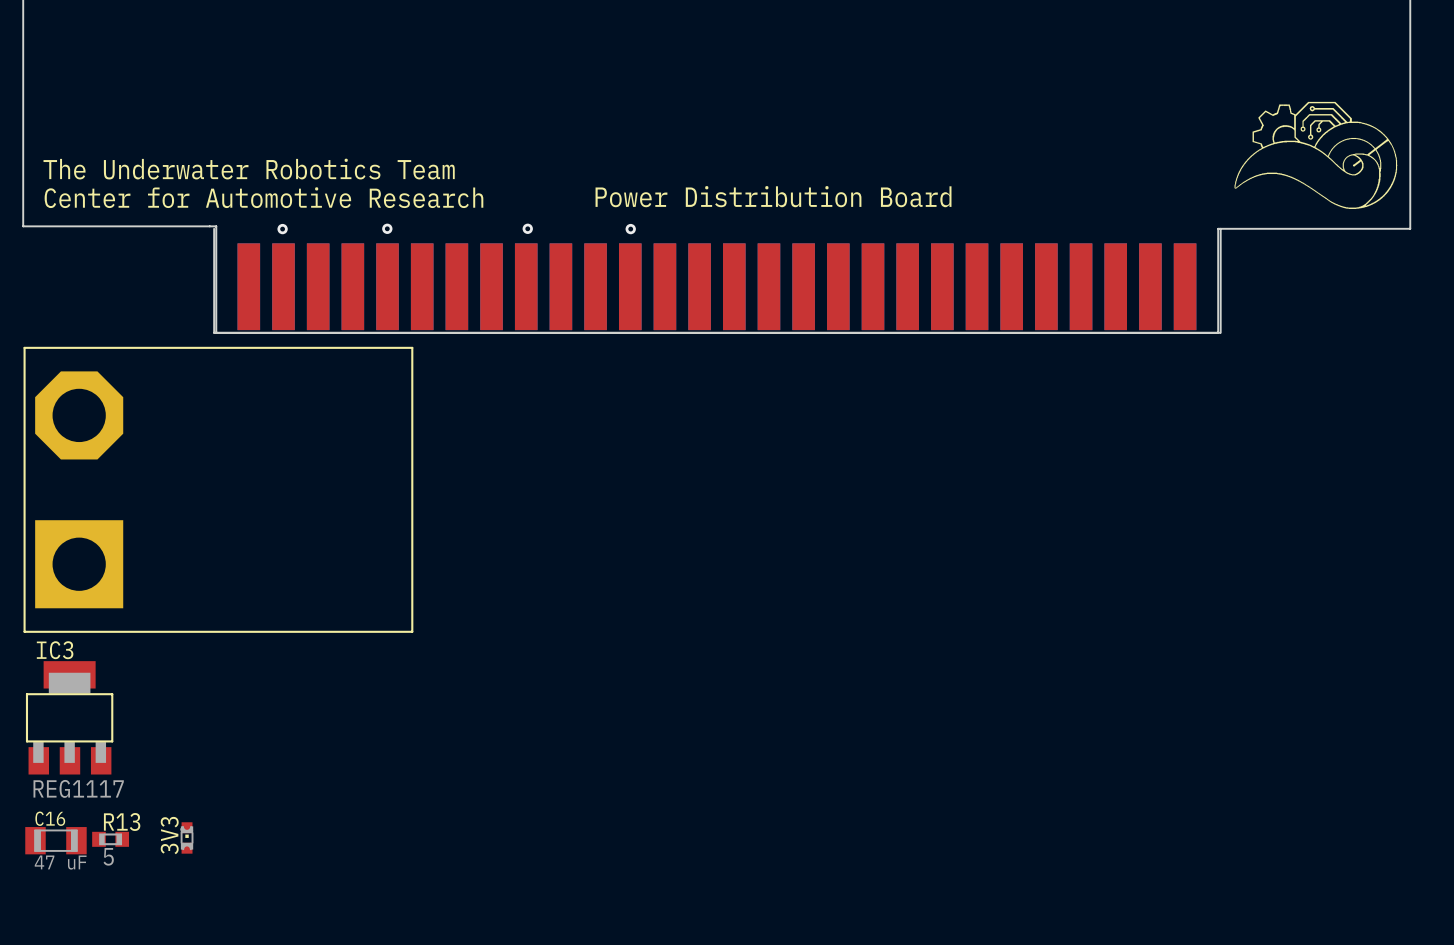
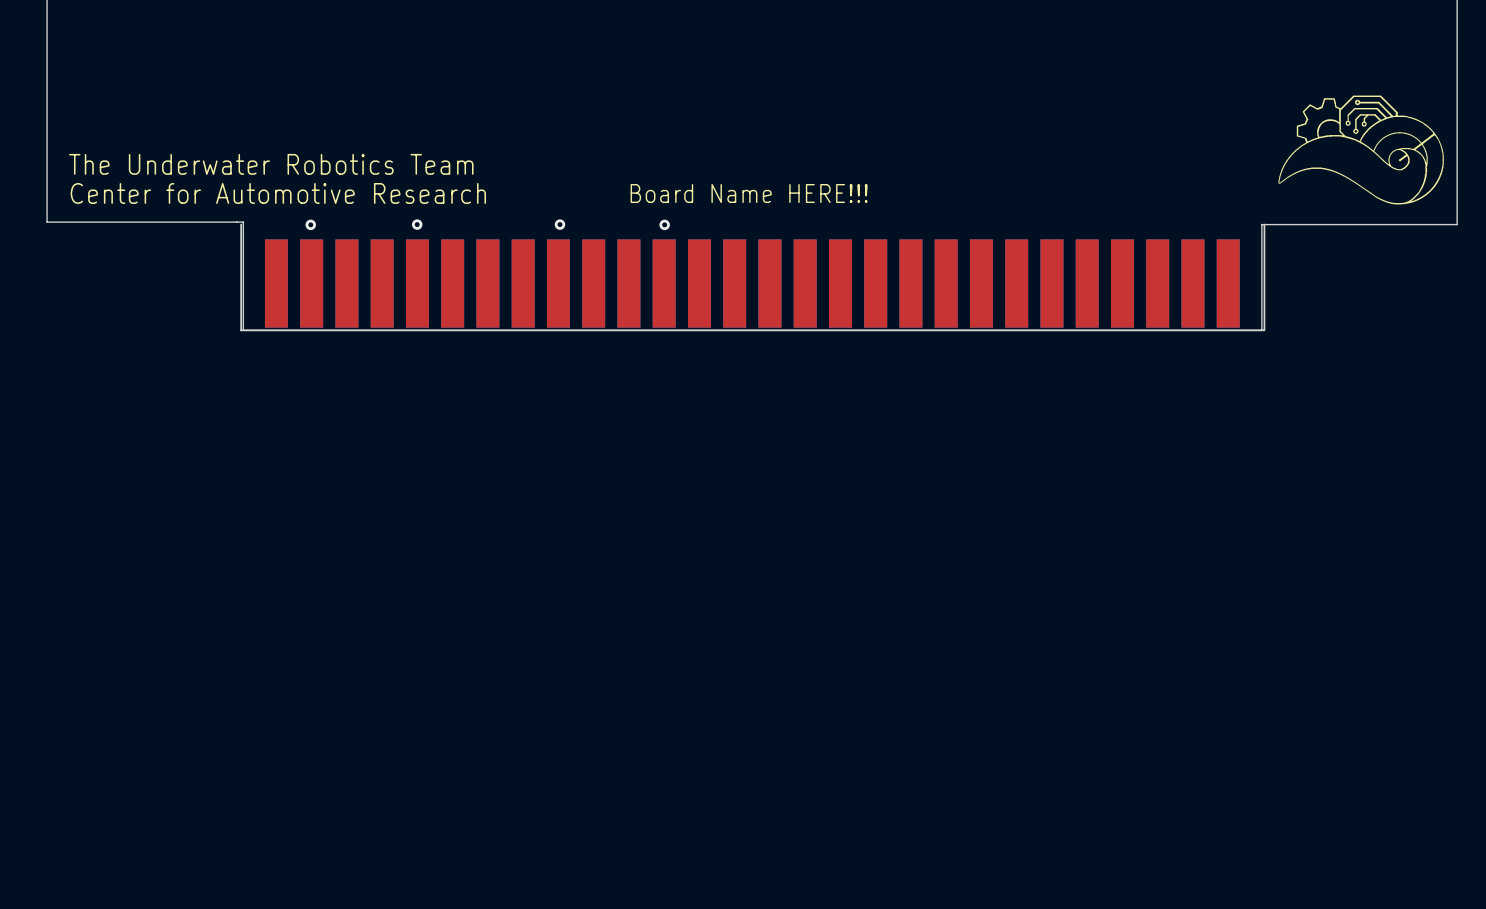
text: Power Distribution Board (773, 196) -> Board Name HERE!!! (749, 193)
part: (218, 489) -> none
IC3: REG1117 (69, 717) -> none
3V3: (187, 837) -> none
R13: 5 (110, 839) -> none
C16: 47 uF (55, 840) -> none

